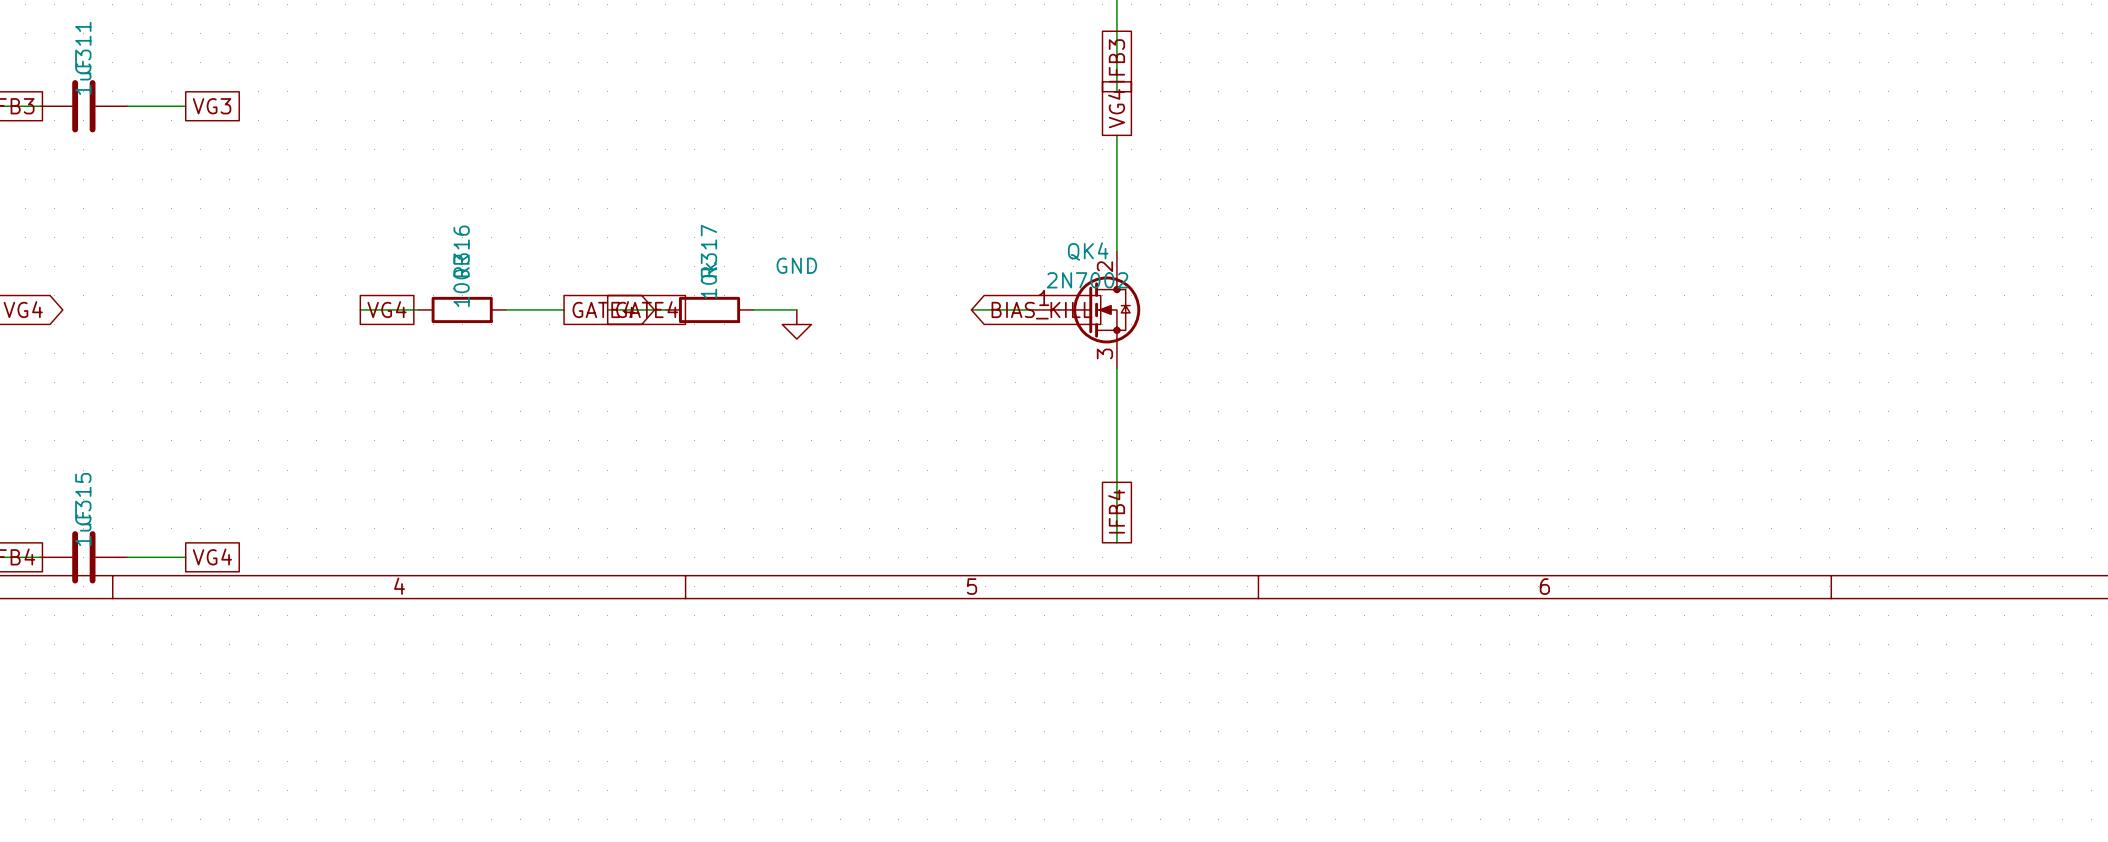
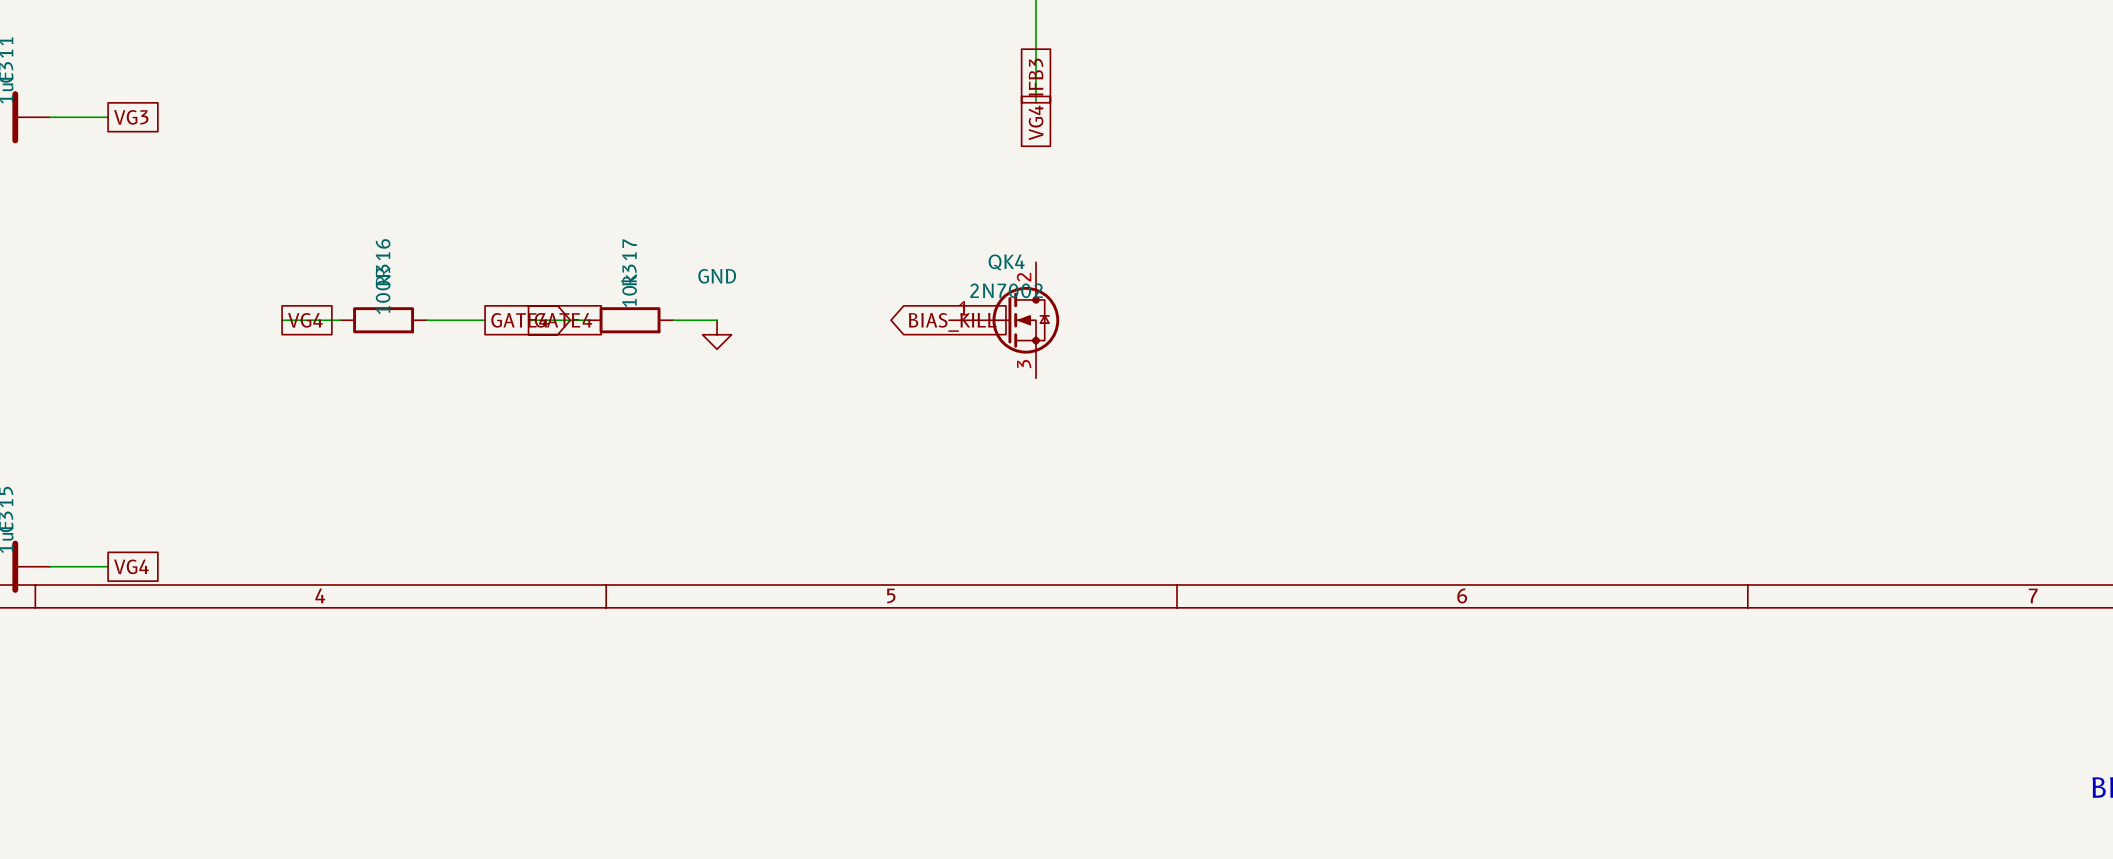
wire: (1116, 135) (1116, 251) -> none
wire: (971, 309) (1029, 309) -> none
wire: (1116, 368) (1116, 542) -> none
global label: IFB4 (1116, 511) -> none

